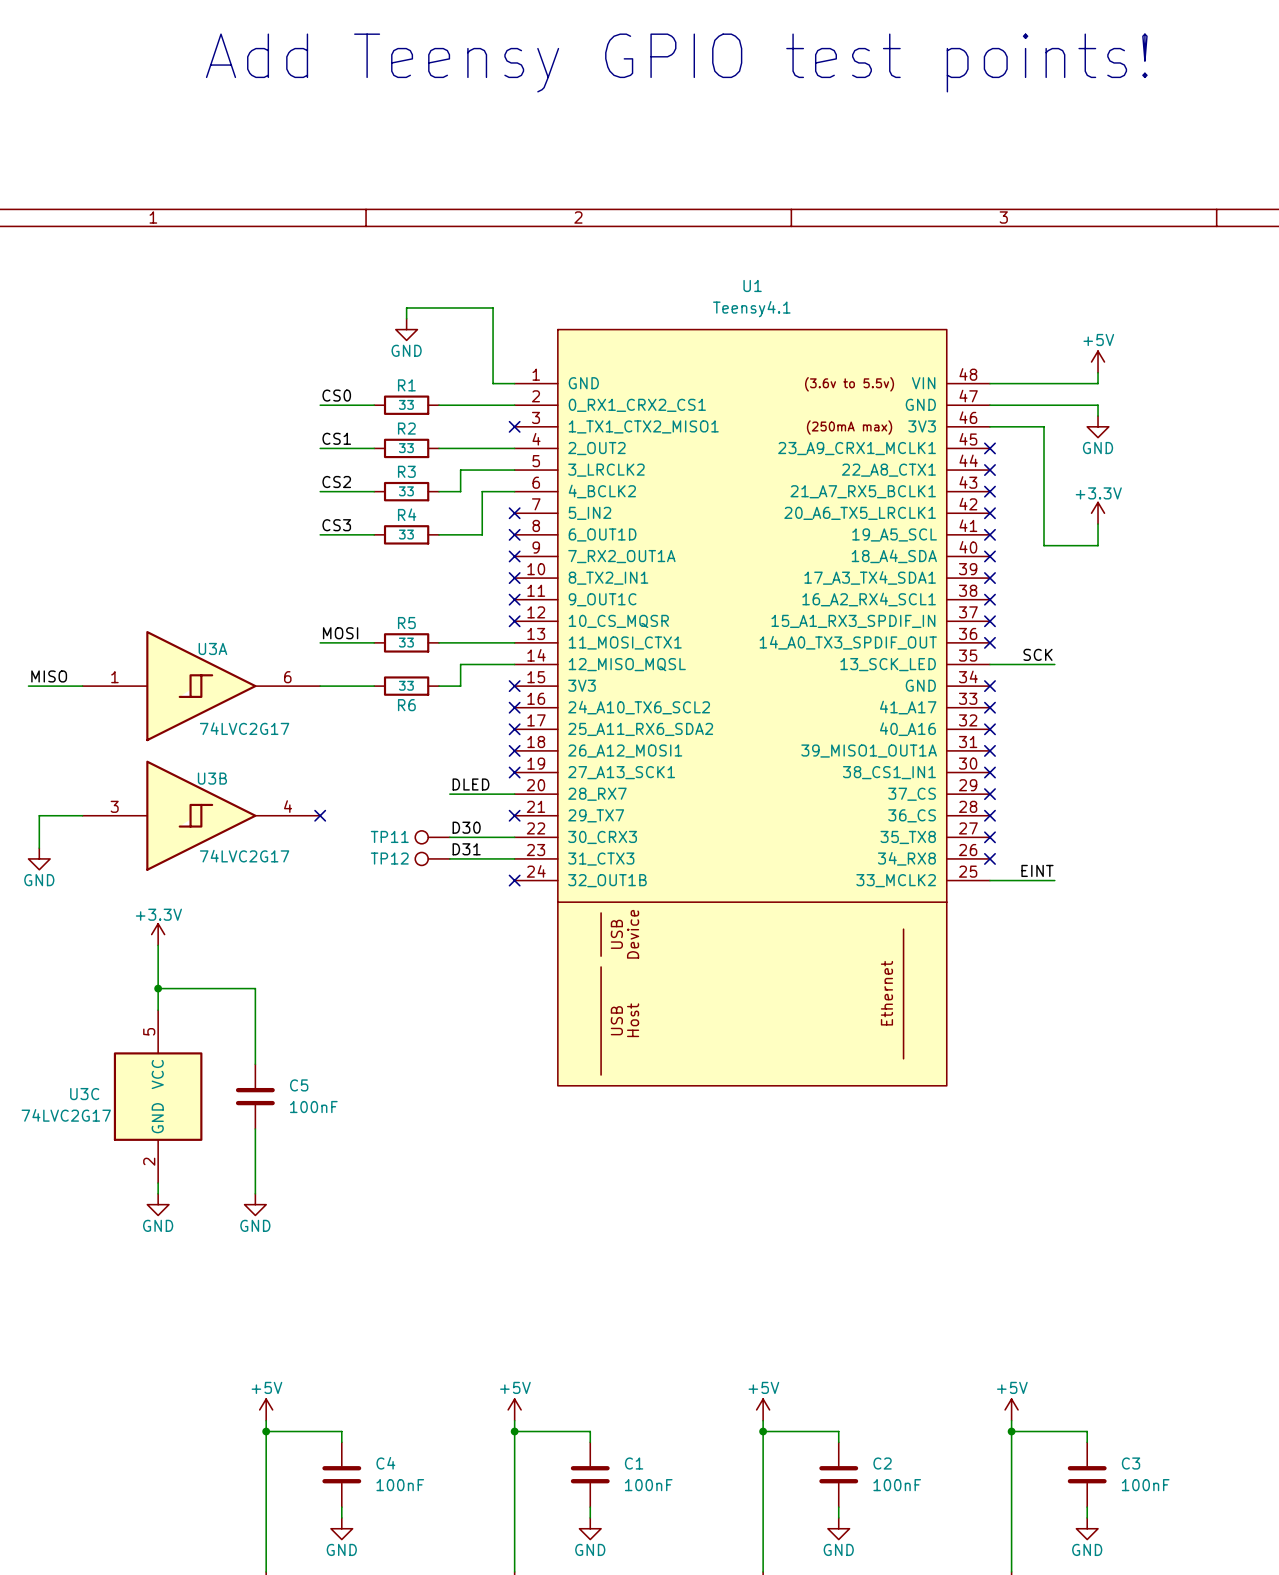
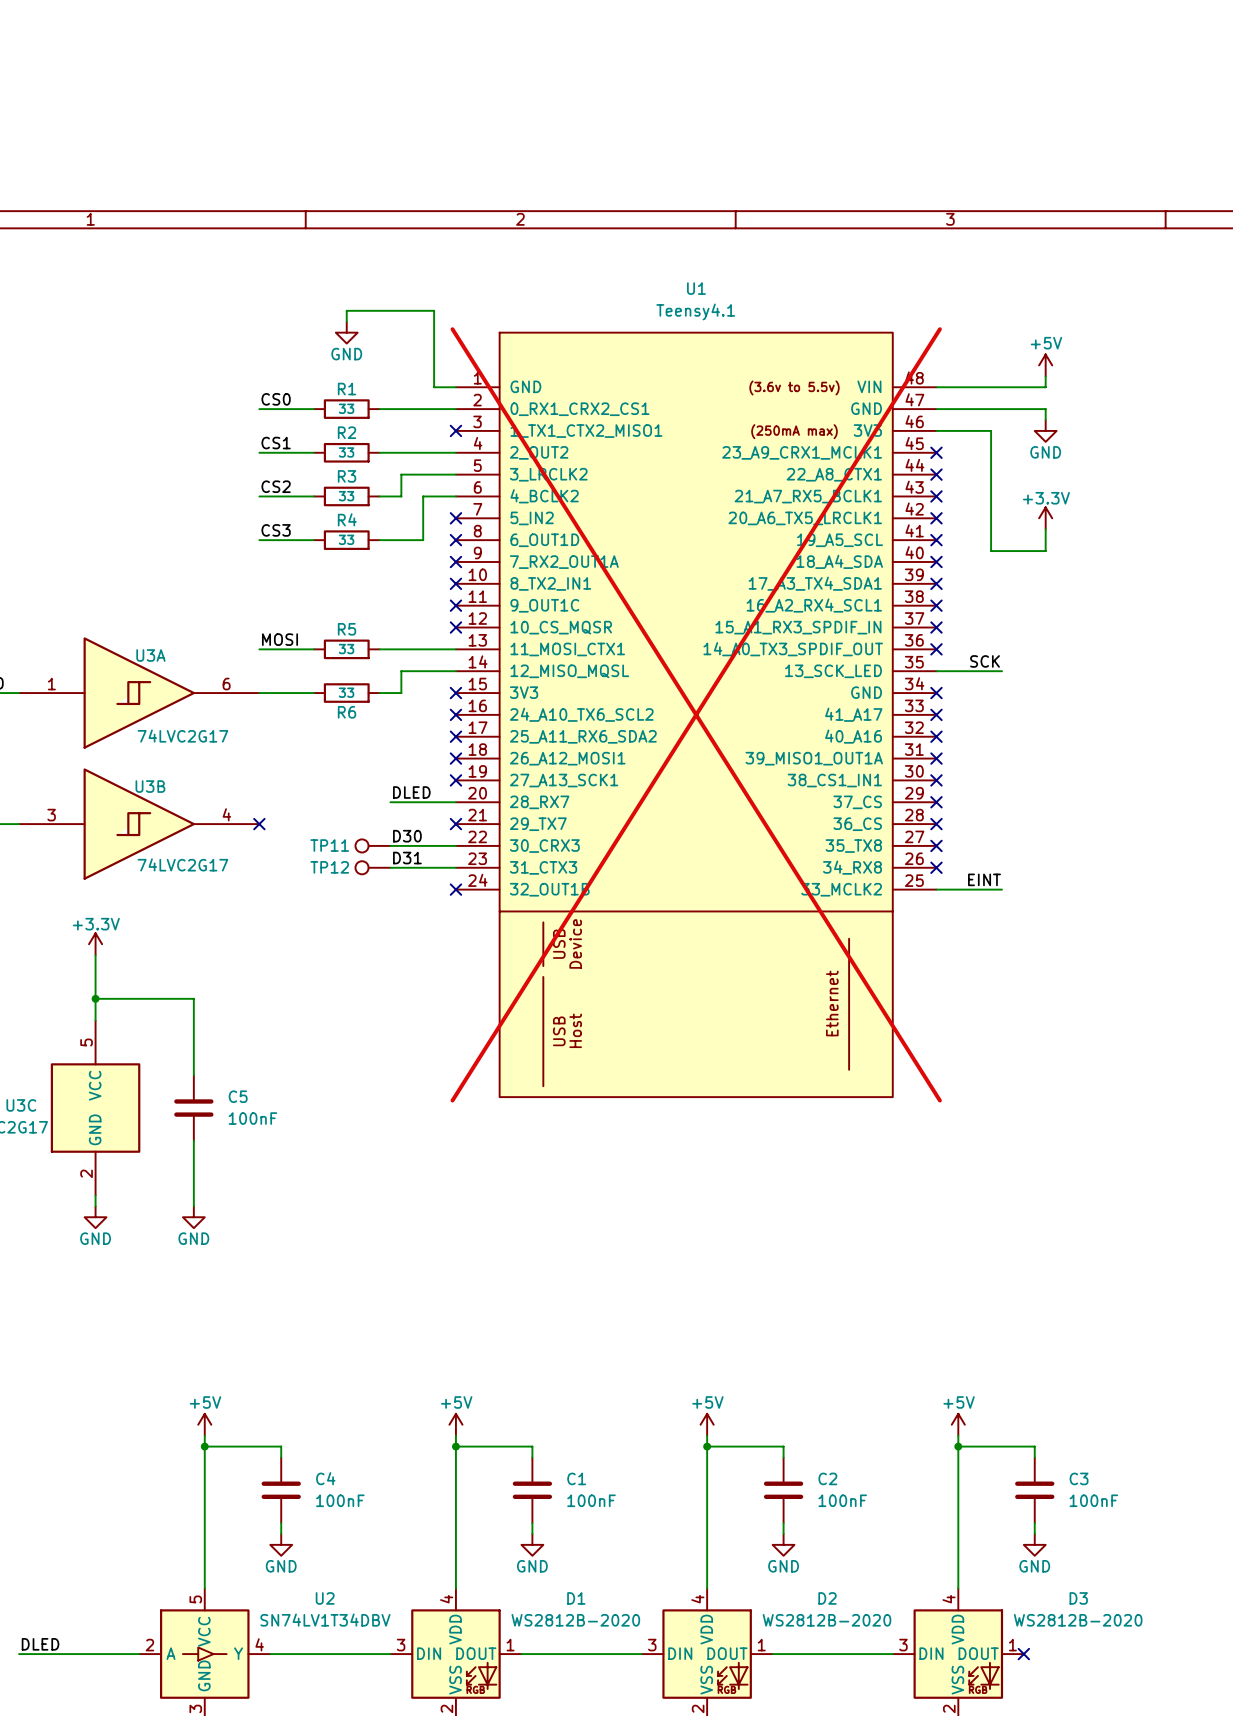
text: Add Teensy GPIO test points! (676, 62) -> none
U1 do-not-place cross: none -> (696, 714)

